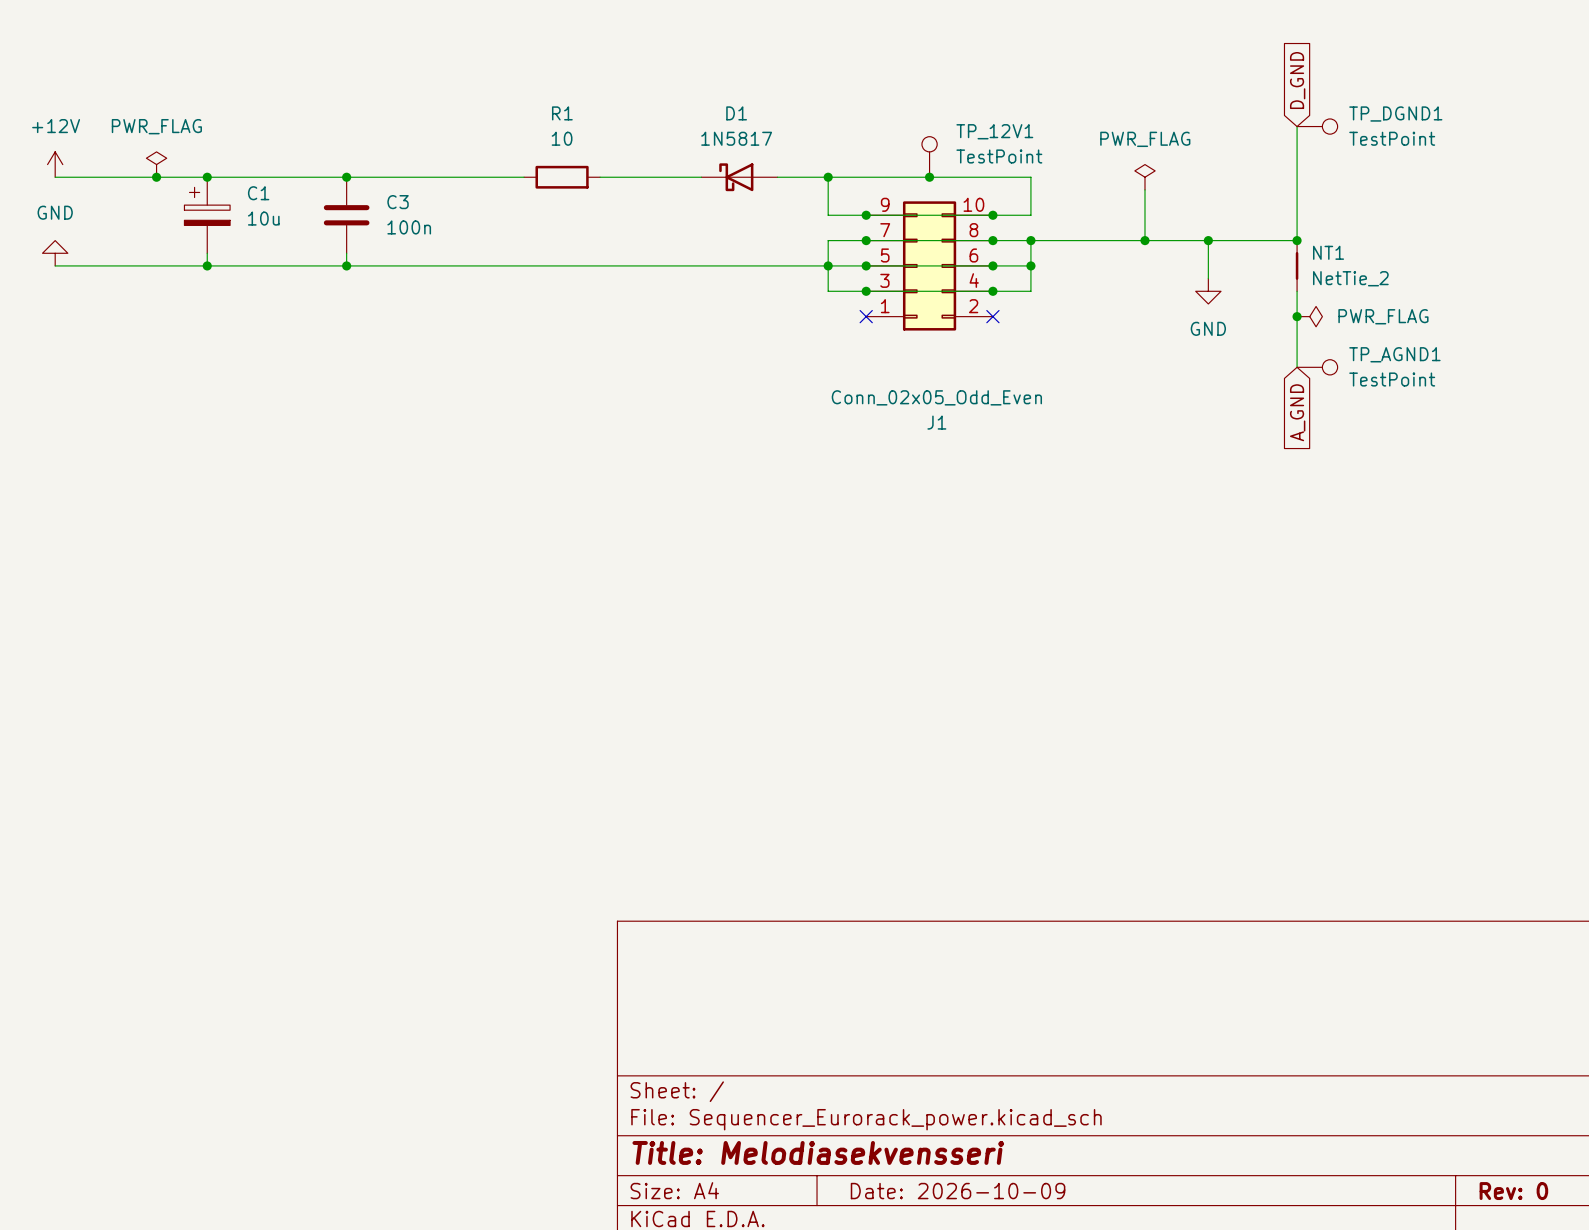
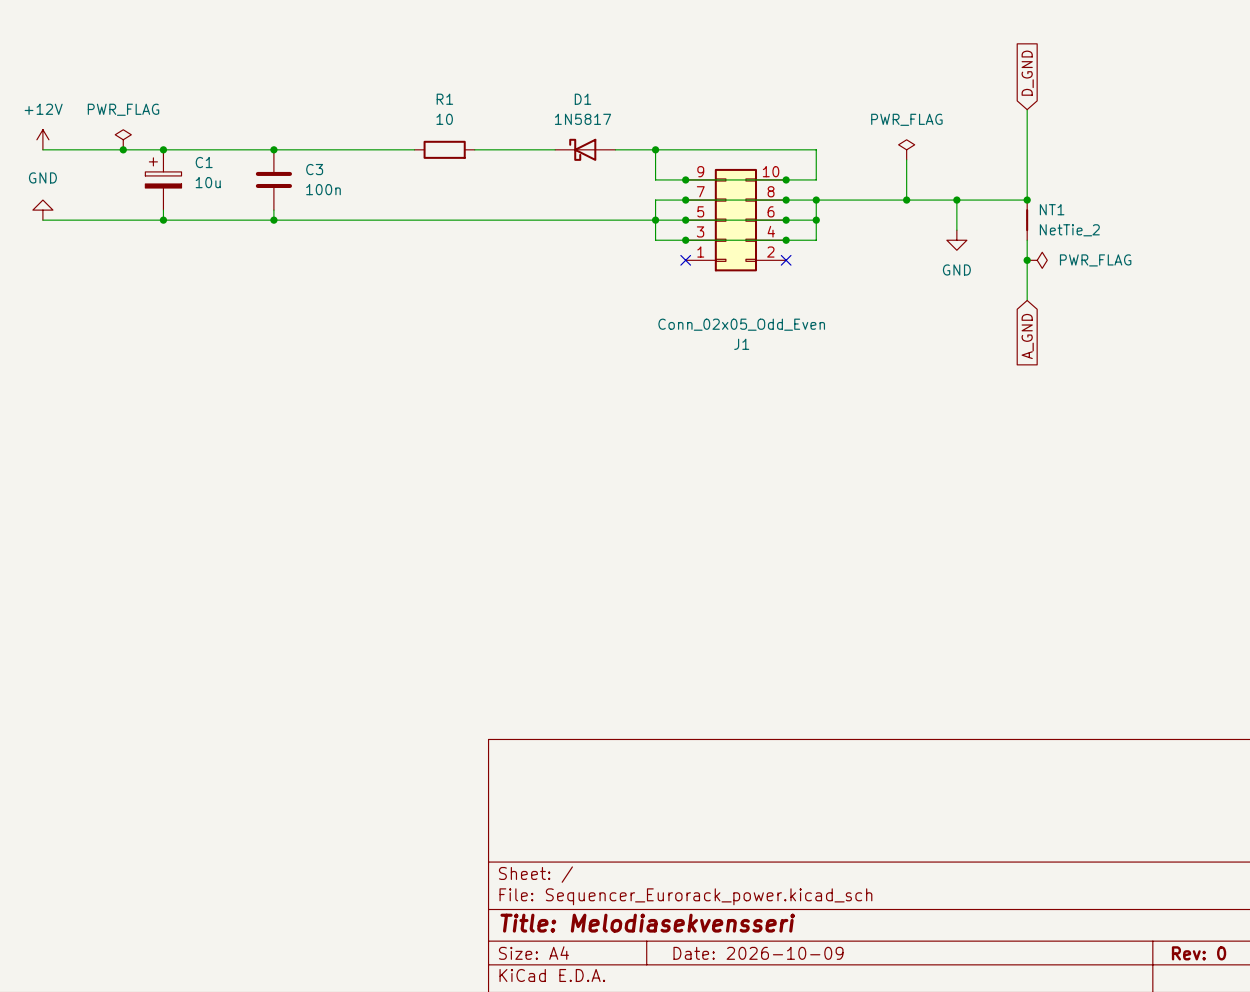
TP_DGND1: TestPoint (1317, 126) -> none
TP_12V1: TestPoint (929, 156) -> none
junction: (929, 177) -> none
TP_AGND1: TestPoint (1317, 367) -> none

